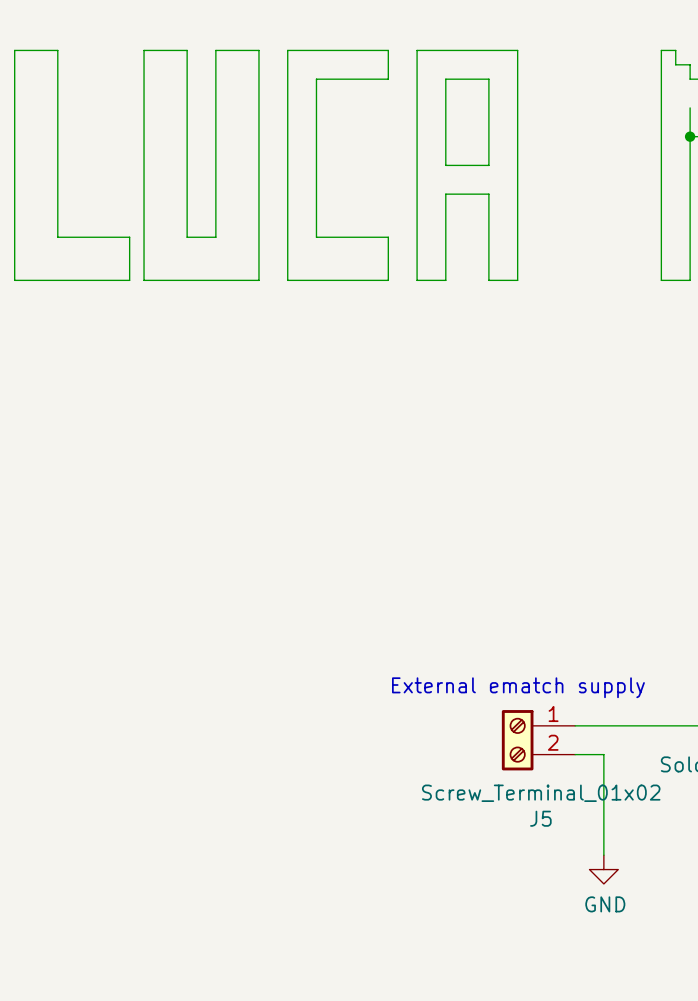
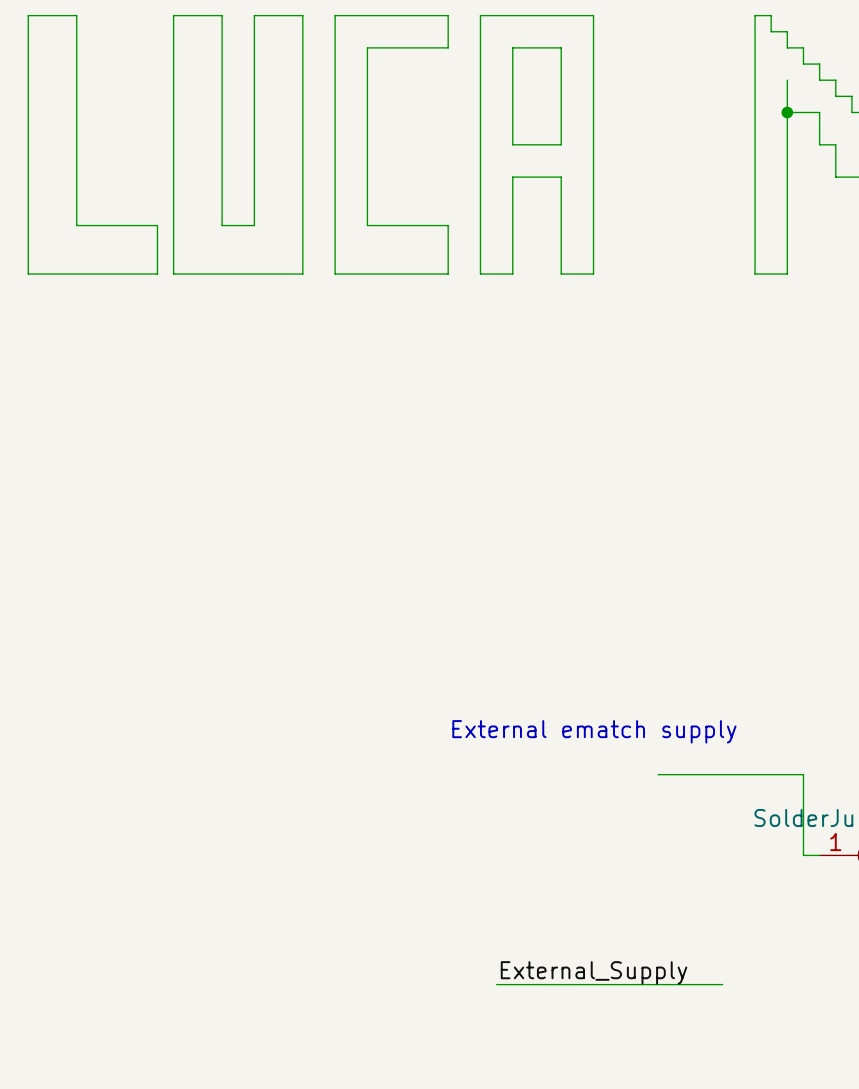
J5: Screw_Terminal_01x02 (538, 740) -> none
wire: (575, 754) (603, 754) (603, 855) -> none
power symbol: GND (603, 869) -> none
label: none -> External_Supply (594, 972)
wire: none -> (496, 984) (722, 984)

